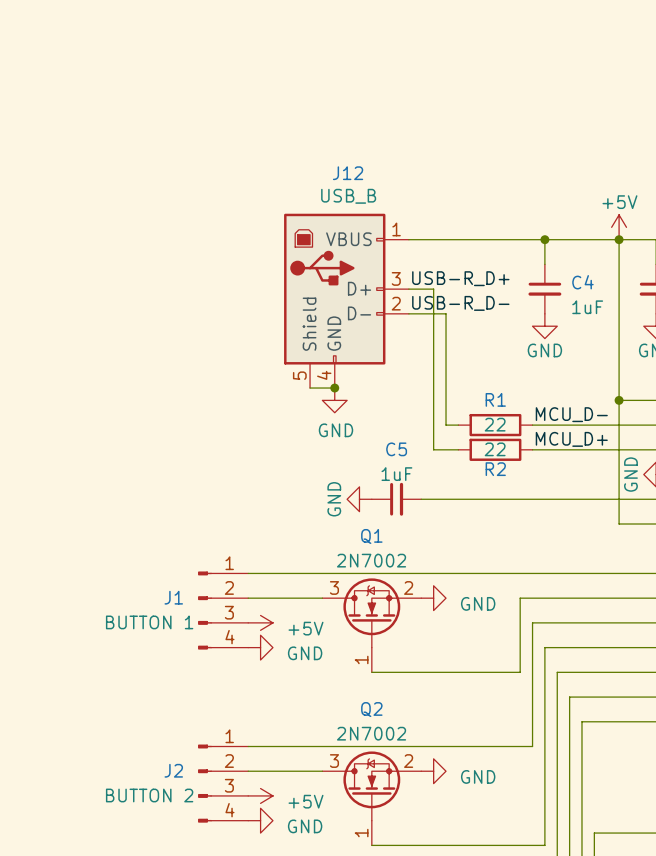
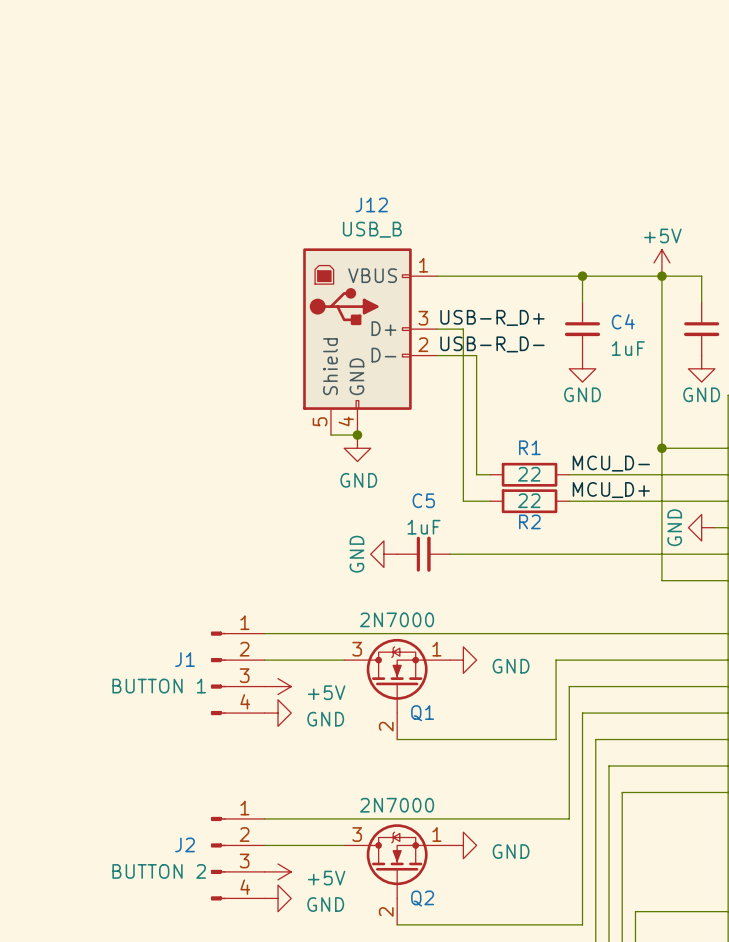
Q1 name position: Q1 (371, 536) -> Q1 (422, 713)
Q1 value: 2N7002 (371, 560) -> 2N7000 (397, 619)
Q1 pin number: 2 (408, 587) -> 1 (436, 649)
Q1 pin number: 1 (361, 659) -> 2 (386, 726)
Q2 name position: Q2 (371, 709) -> Q2 (422, 898)
Q2 value: 2N7002 (371, 733) -> 2N7000 (397, 805)
Q2 pin number: 2 (408, 761) -> 1 (436, 834)
Q2 pin number: 1 (361, 833) -> 2 (386, 911)

